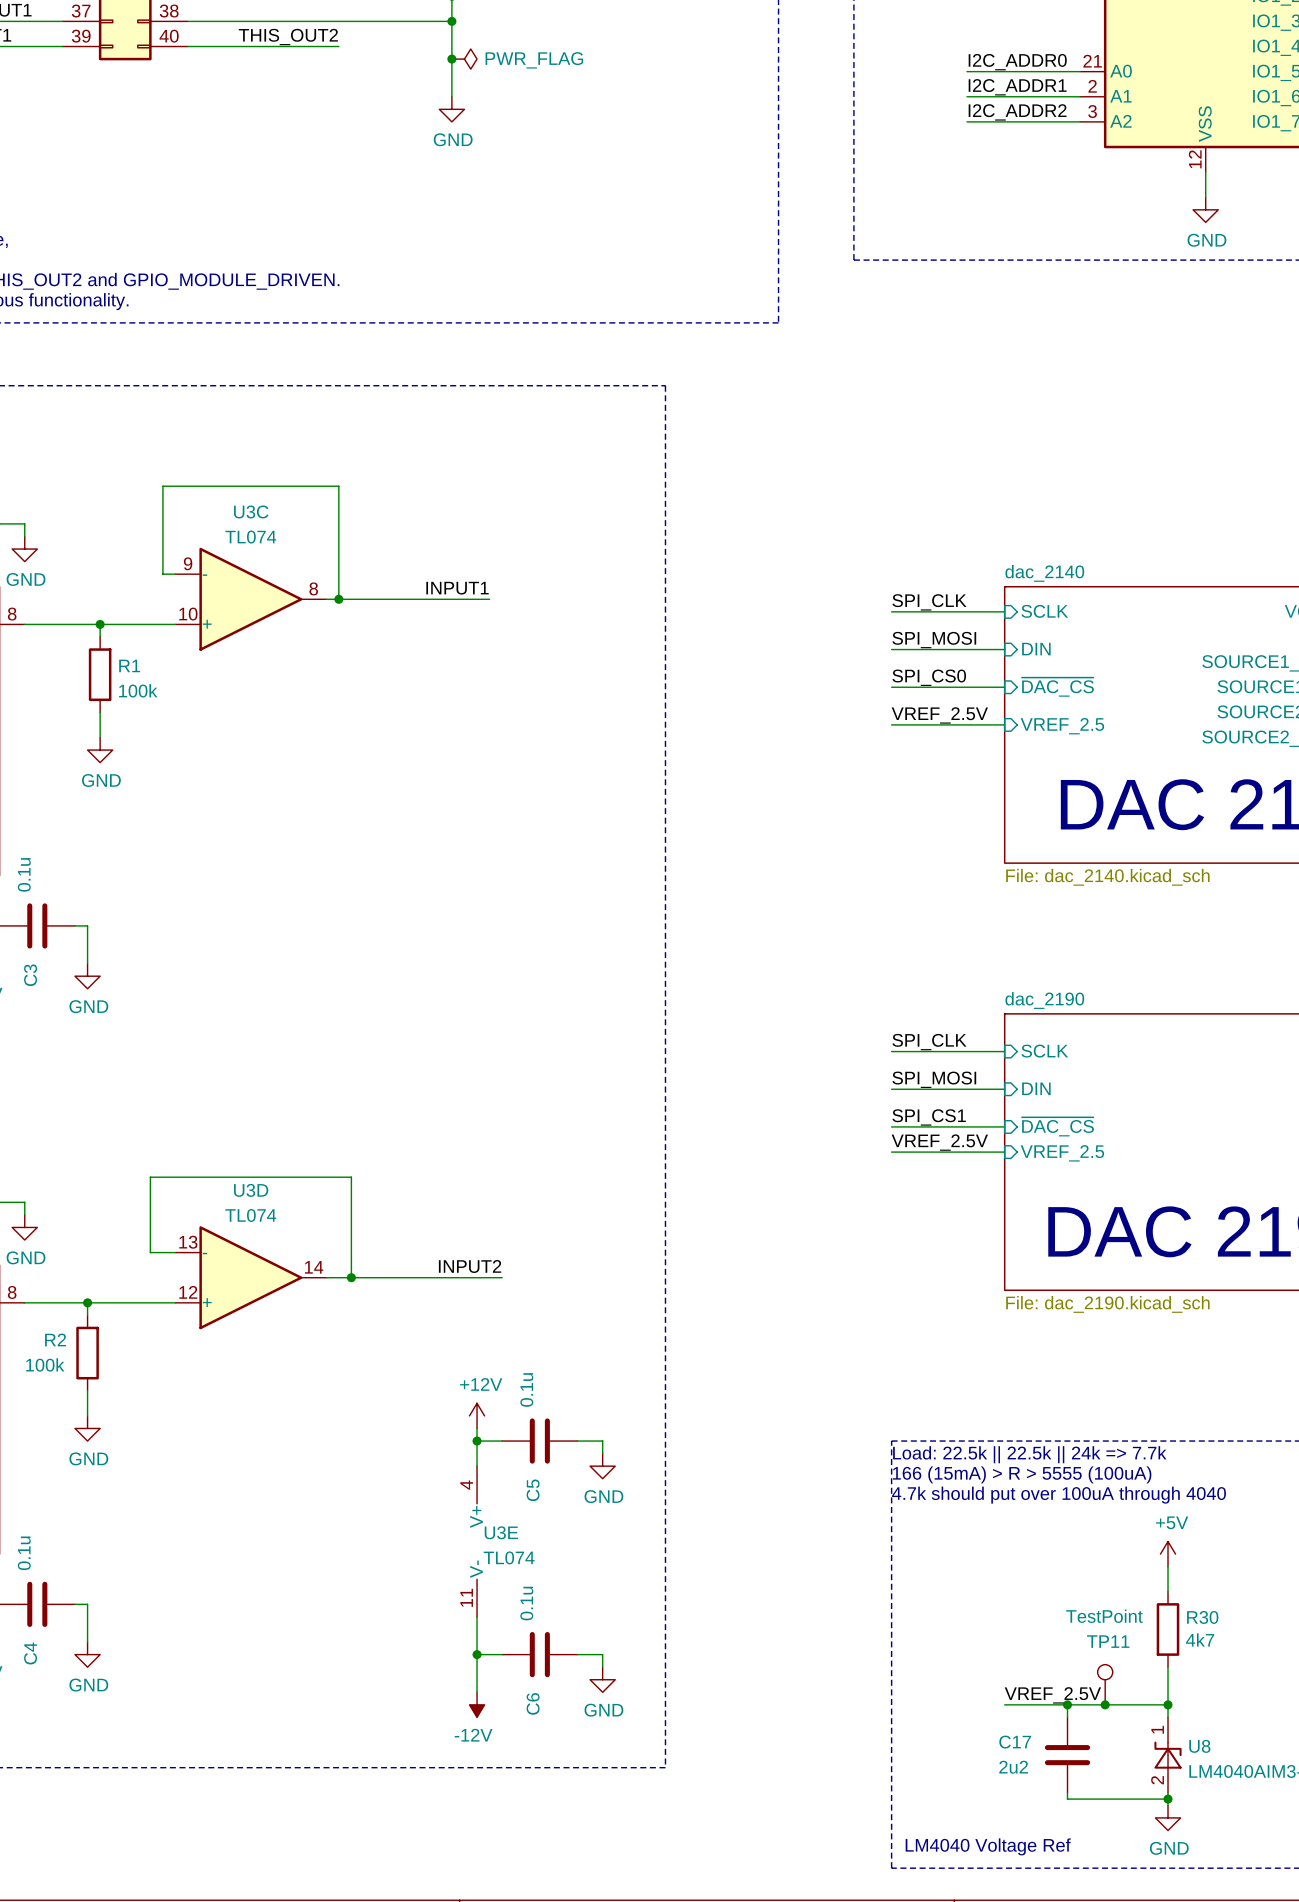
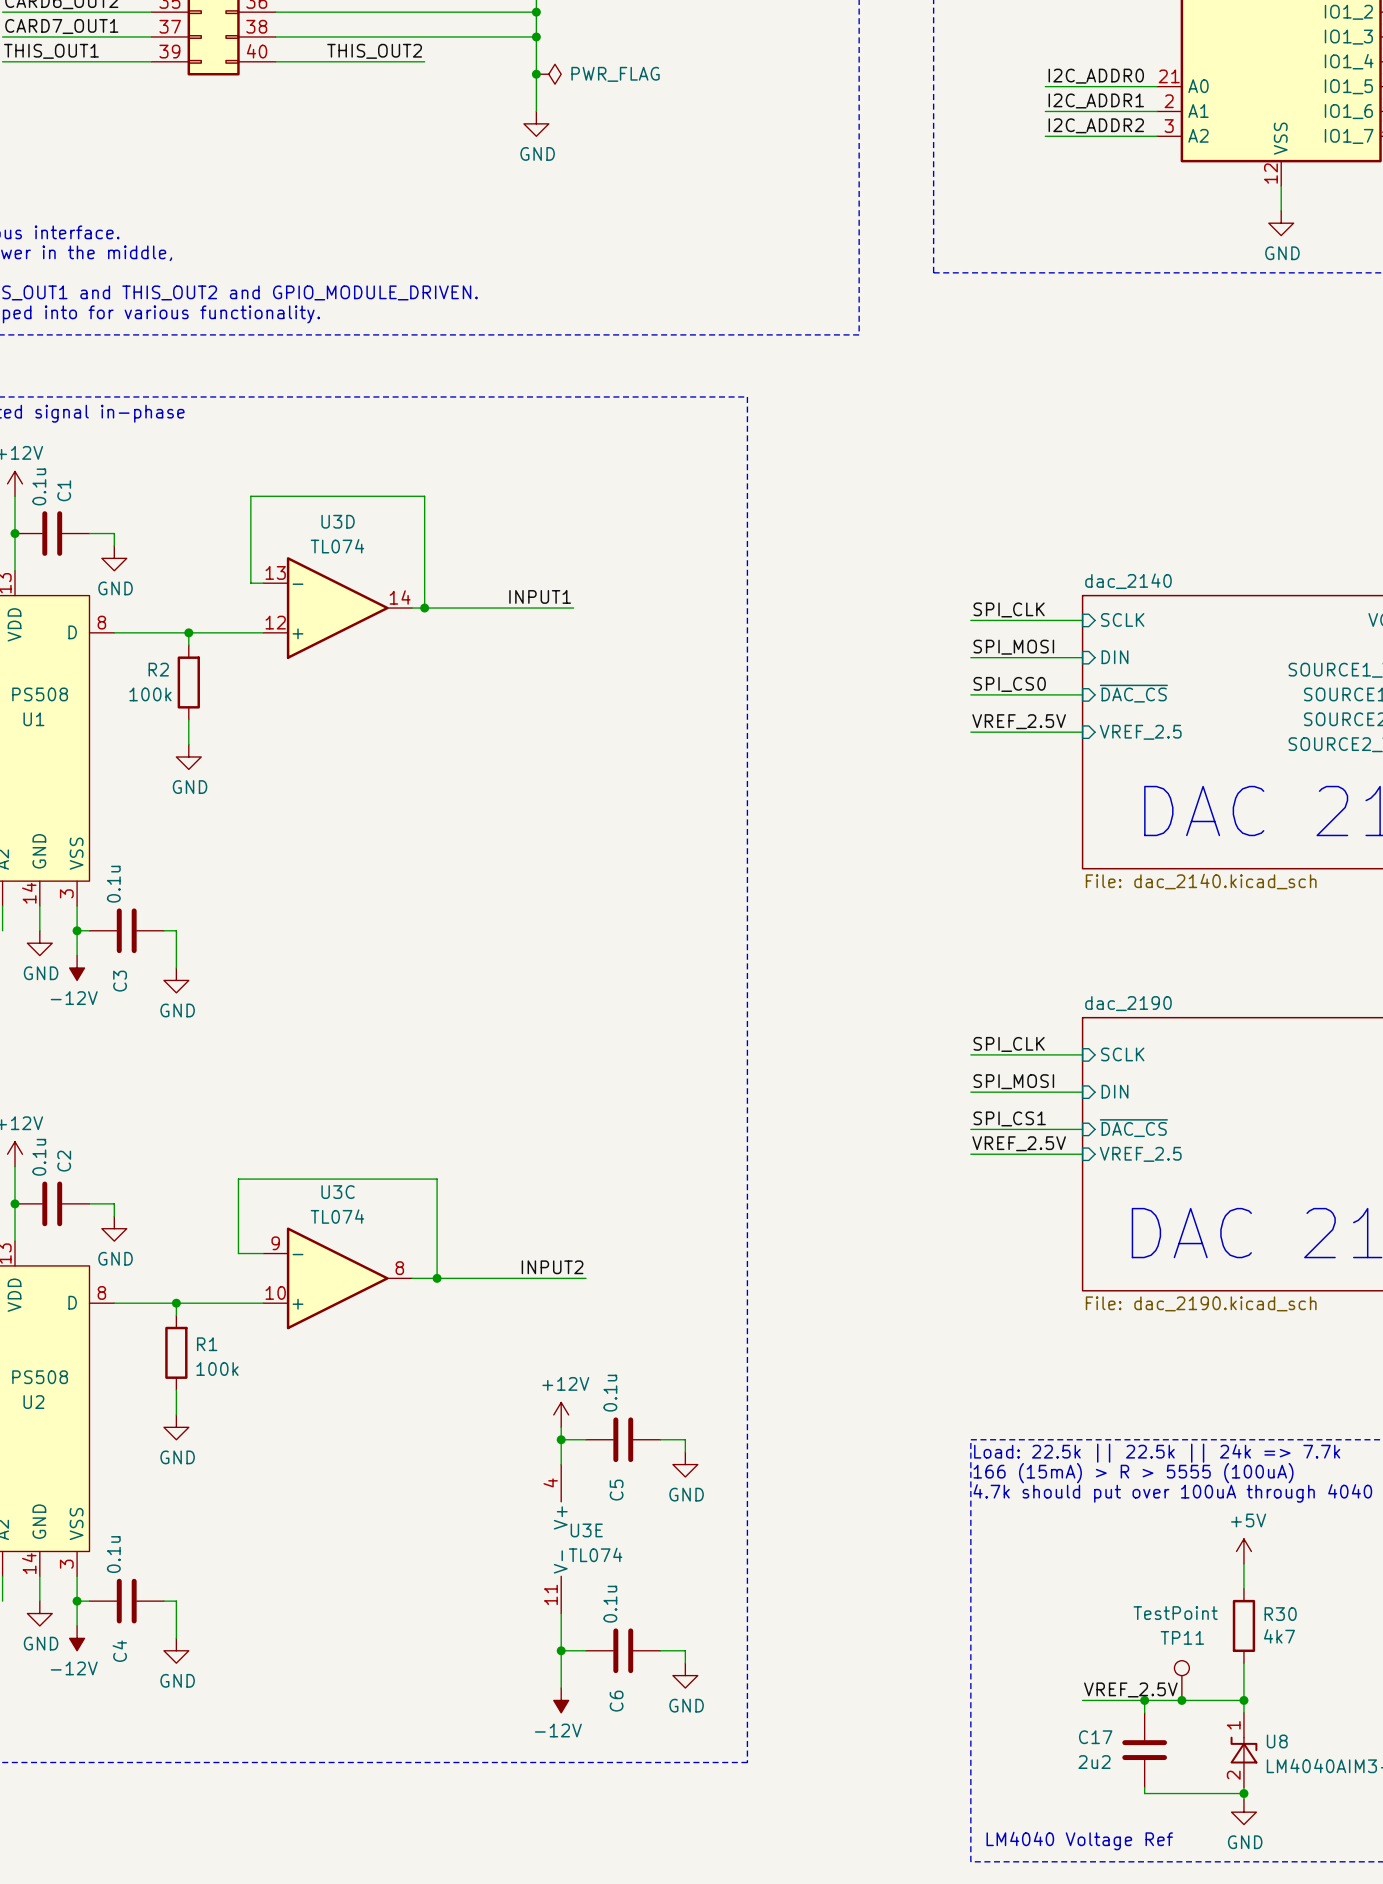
U3C position: (250, 599) -> (337, 1278)
R1 name: R1 (129, 665) -> R2 (158, 669)
R1 value position: 100k (138, 690) -> 100k (150, 694)
U3D position: (250, 1277) -> (337, 608)
R2 name: R2 (55, 1339) -> R1 (207, 1344)
R2 value position: 100k (45, 1364) -> 100k (217, 1369)

